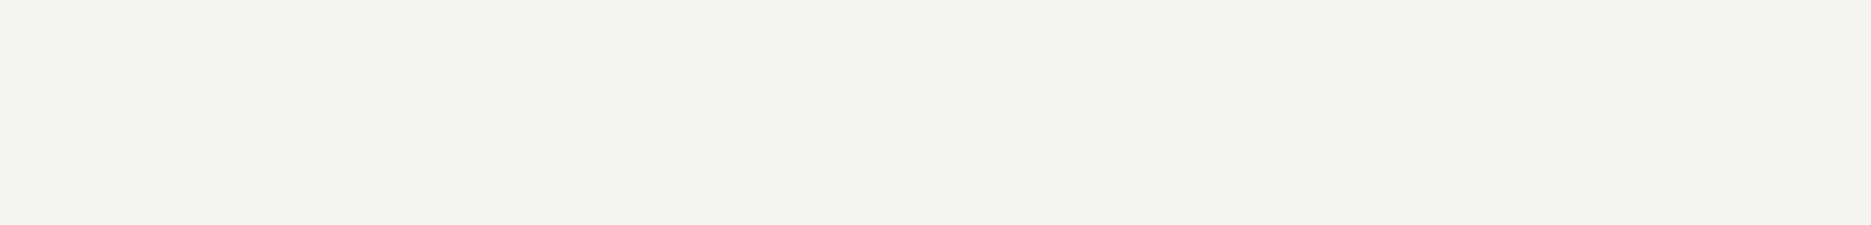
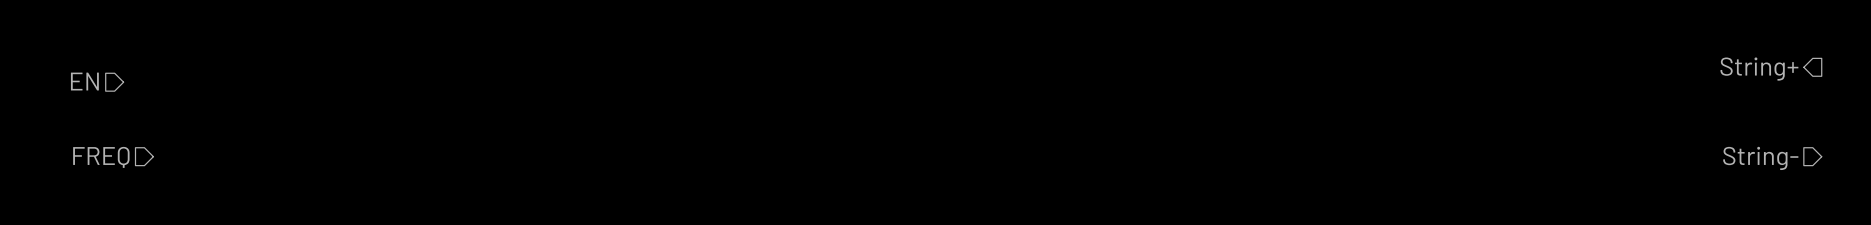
hierarchical label: none -> String+ (1759, 69)
hierarchical label: none -> EN (84, 81)
hierarchical label: none -> FREQ (101, 157)
hierarchical label: none -> String- (1760, 158)

